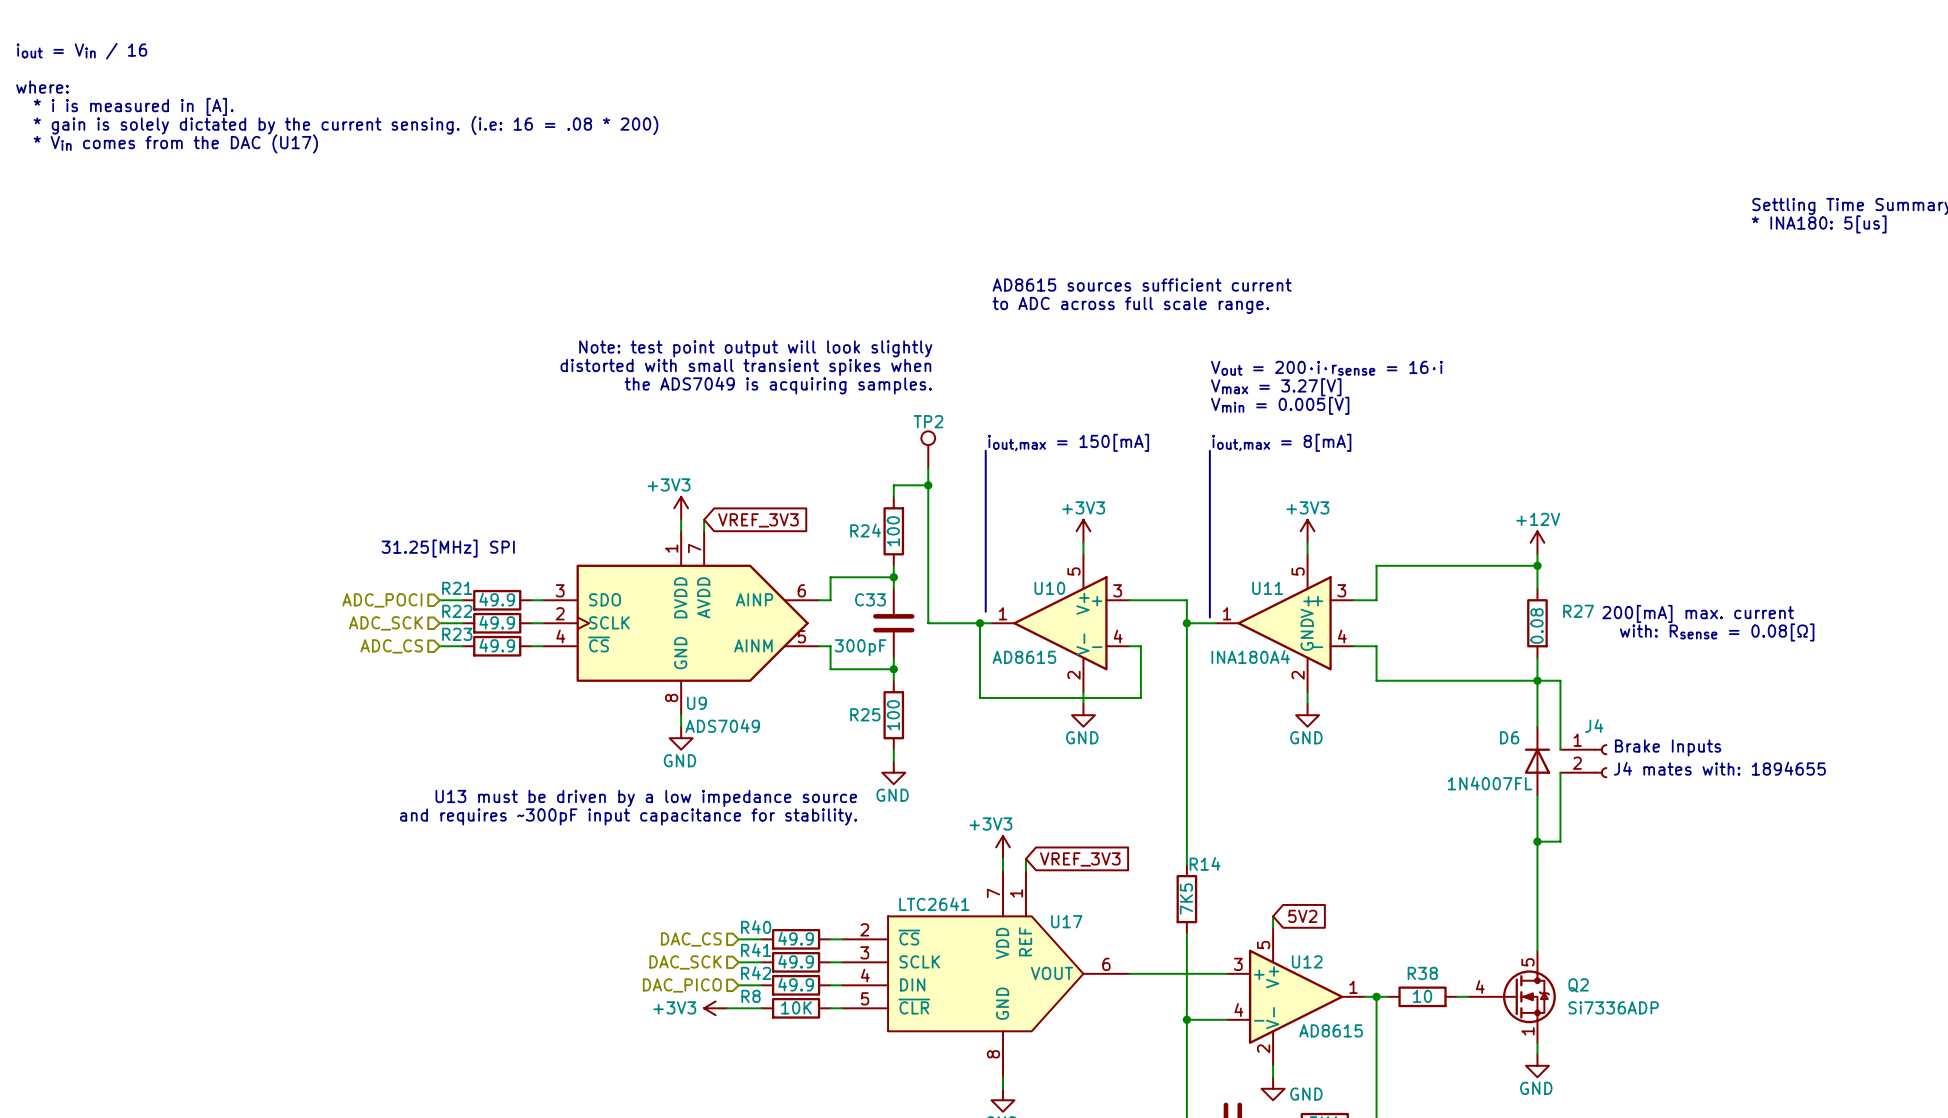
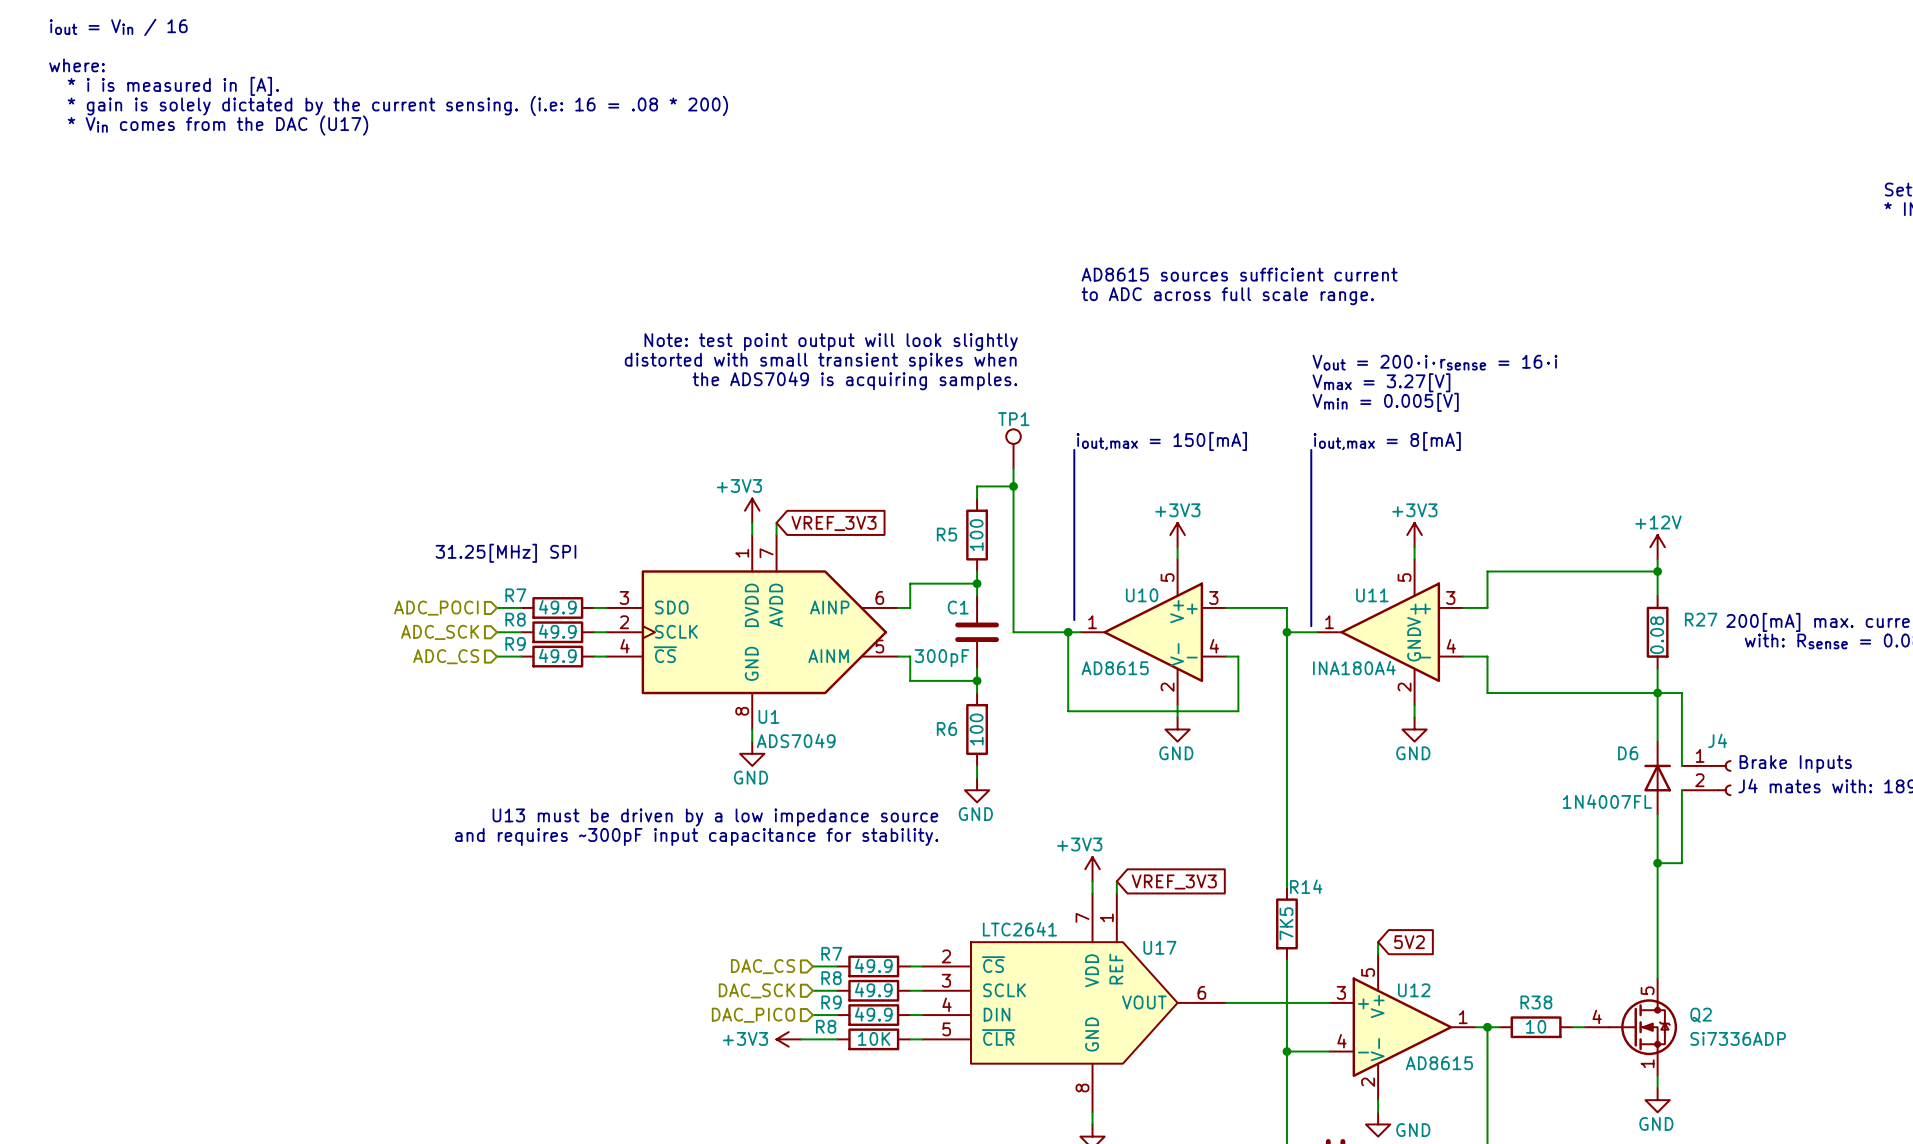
TP2 name: TP2 (928, 421) -> TP1 (1013, 419)
R24 name: R24 (865, 530) -> R5 (946, 534)
R21 name: R21 (457, 588) -> R7 (515, 595)
C33 name: C33 (870, 599) -> C1 (958, 607)
R22 name: R22 (457, 611) -> R8 (515, 619)
R23 name: R23 (457, 634) -> R9 (515, 643)
U9 name: U9 (696, 703) -> U1 (768, 716)
R25 name: R25 (865, 714) -> R6 (946, 729)
R40 name: R40 (756, 927) -> R7 (831, 953)
R41 name: R41 (756, 950) -> R8 (831, 978)
R42 name: R42 (756, 973) -> R9 (831, 1002)

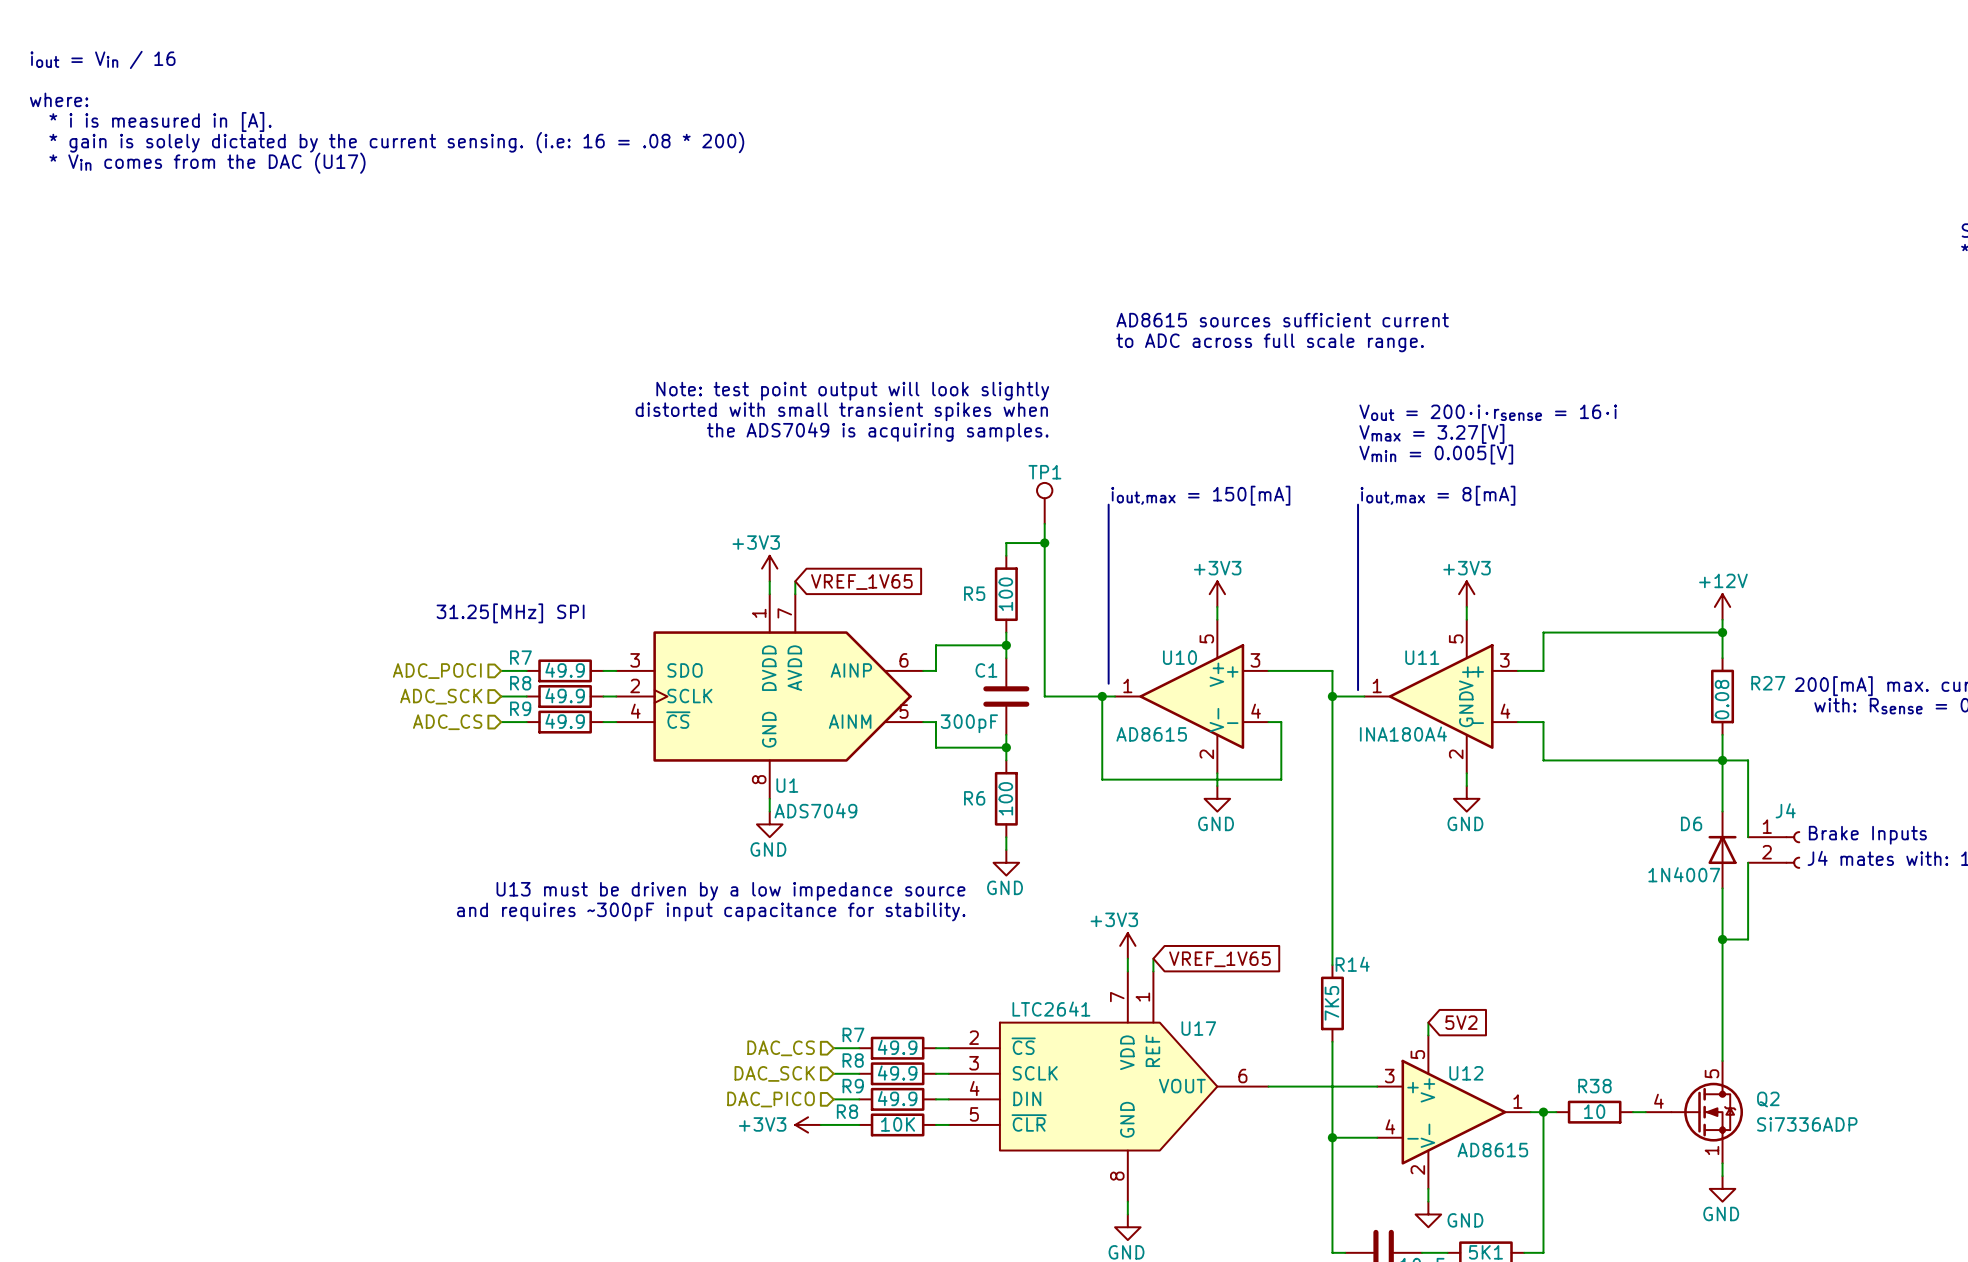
global label: VREF_3V3 (834, 523) -> VREF_1V65 (861, 582)
D6 value: 1N4007FL (1607, 801) -> 1N4007 (1684, 874)
global label: VREF_3V3 (1174, 881) -> VREF_1V65 (1219, 959)

